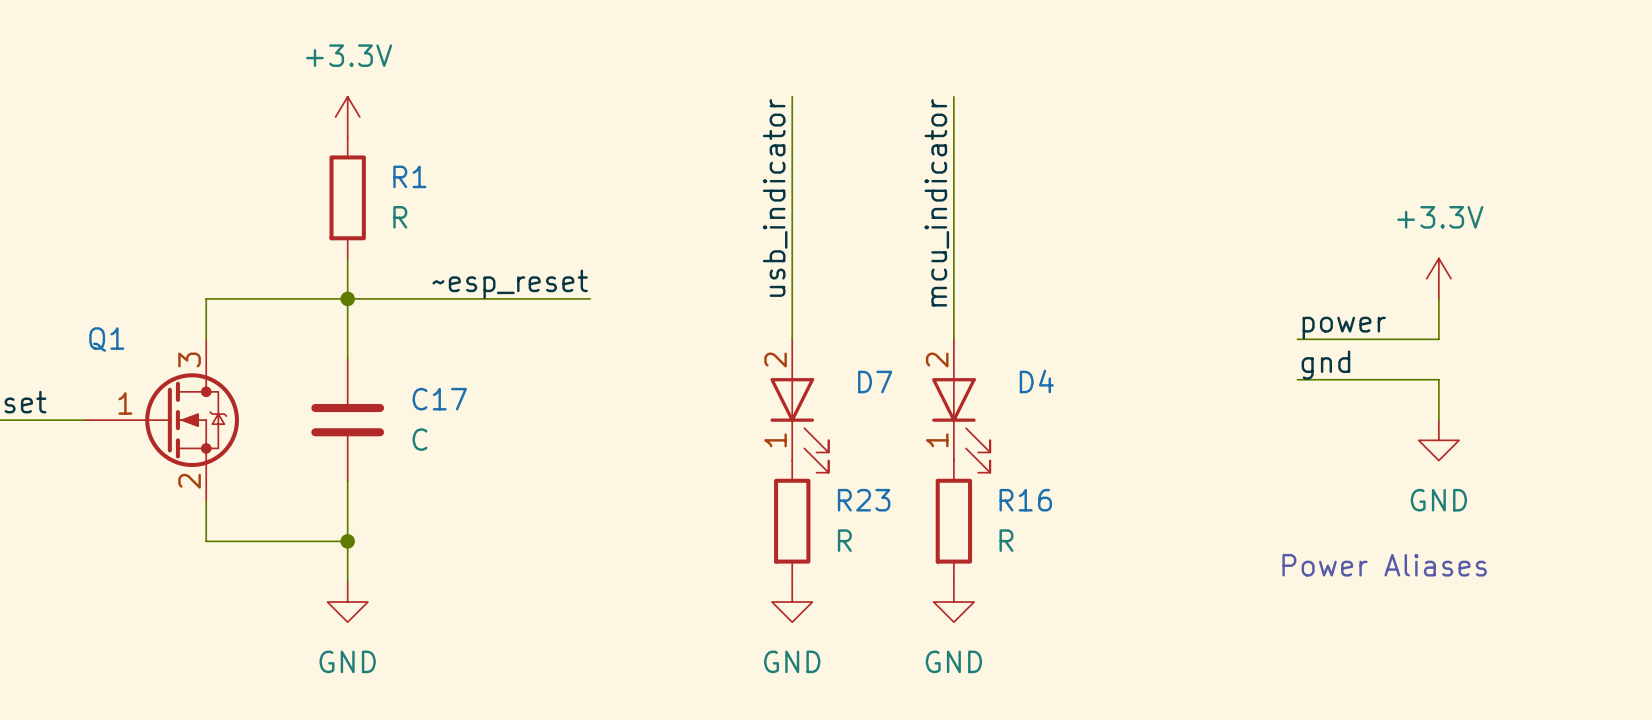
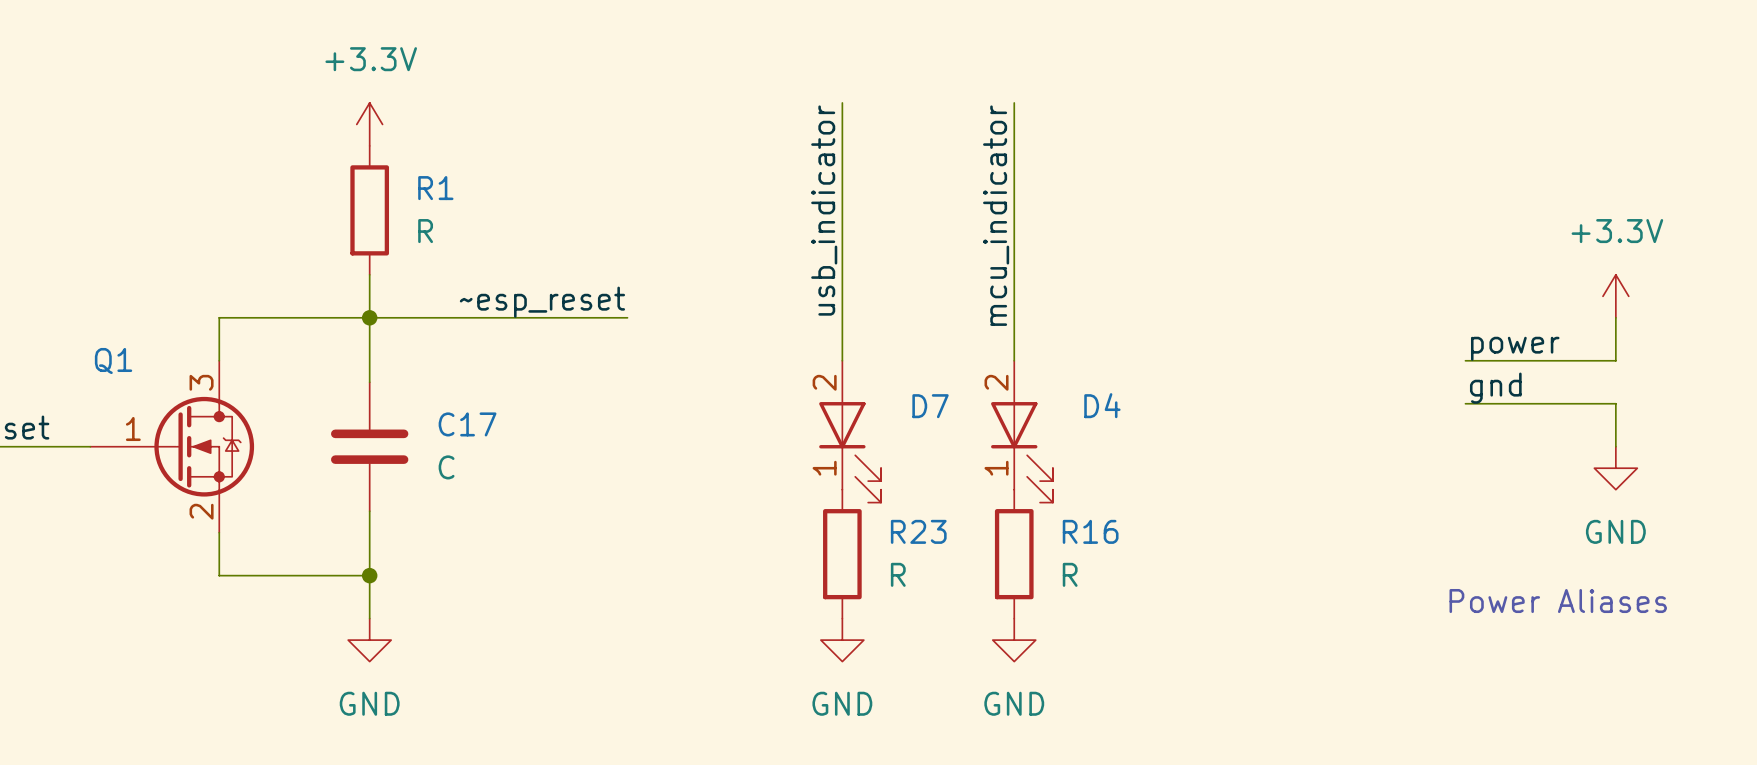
power symbol position: +3.3V (1438, 278) -> +3.3V (1615, 296)
wire: (1438, 298) (1438, 339) -> (1615, 317) (1615, 360) (1529, 360)
label position: power (1344, 328) -> power (1515, 348)
wire: (1297, 339) (1378, 339) -> none
label position: gnd (1325, 365) -> gnd (1495, 388)
wire: (1297, 379) (1378, 379) -> none
wire: (1438, 379) (1438, 420) -> (1529, 403) (1615, 403) (1615, 446)
power symbol position: GND (1438, 440) -> GND (1615, 468)
text position: Power Aliases (1384, 565) -> Power Aliases (1558, 601)

